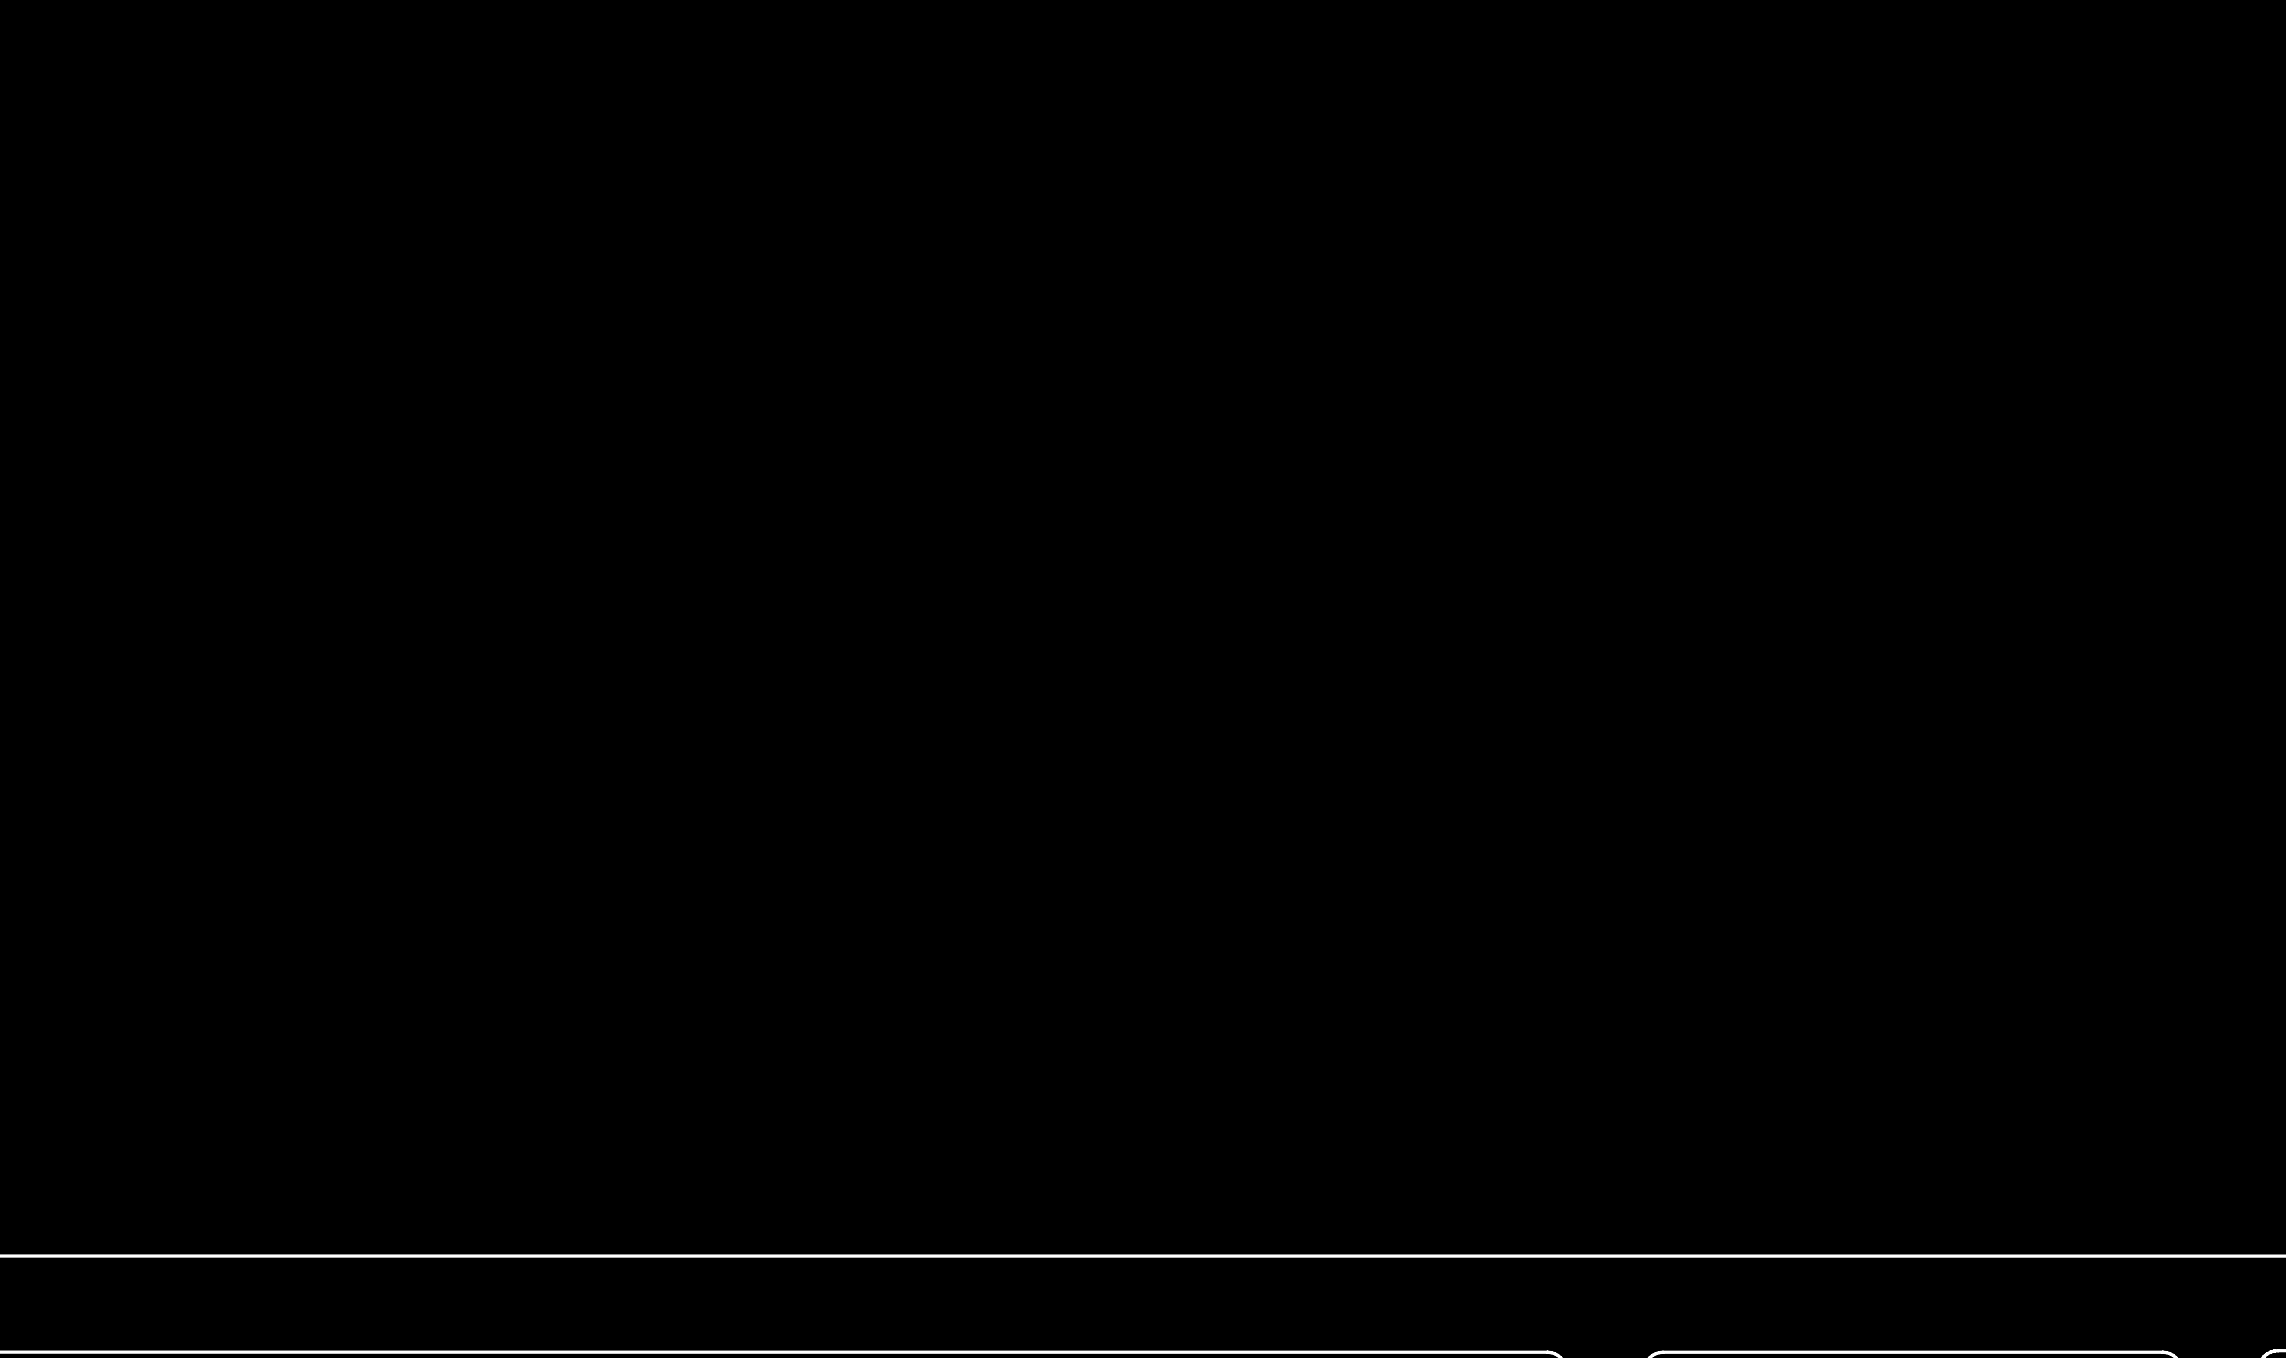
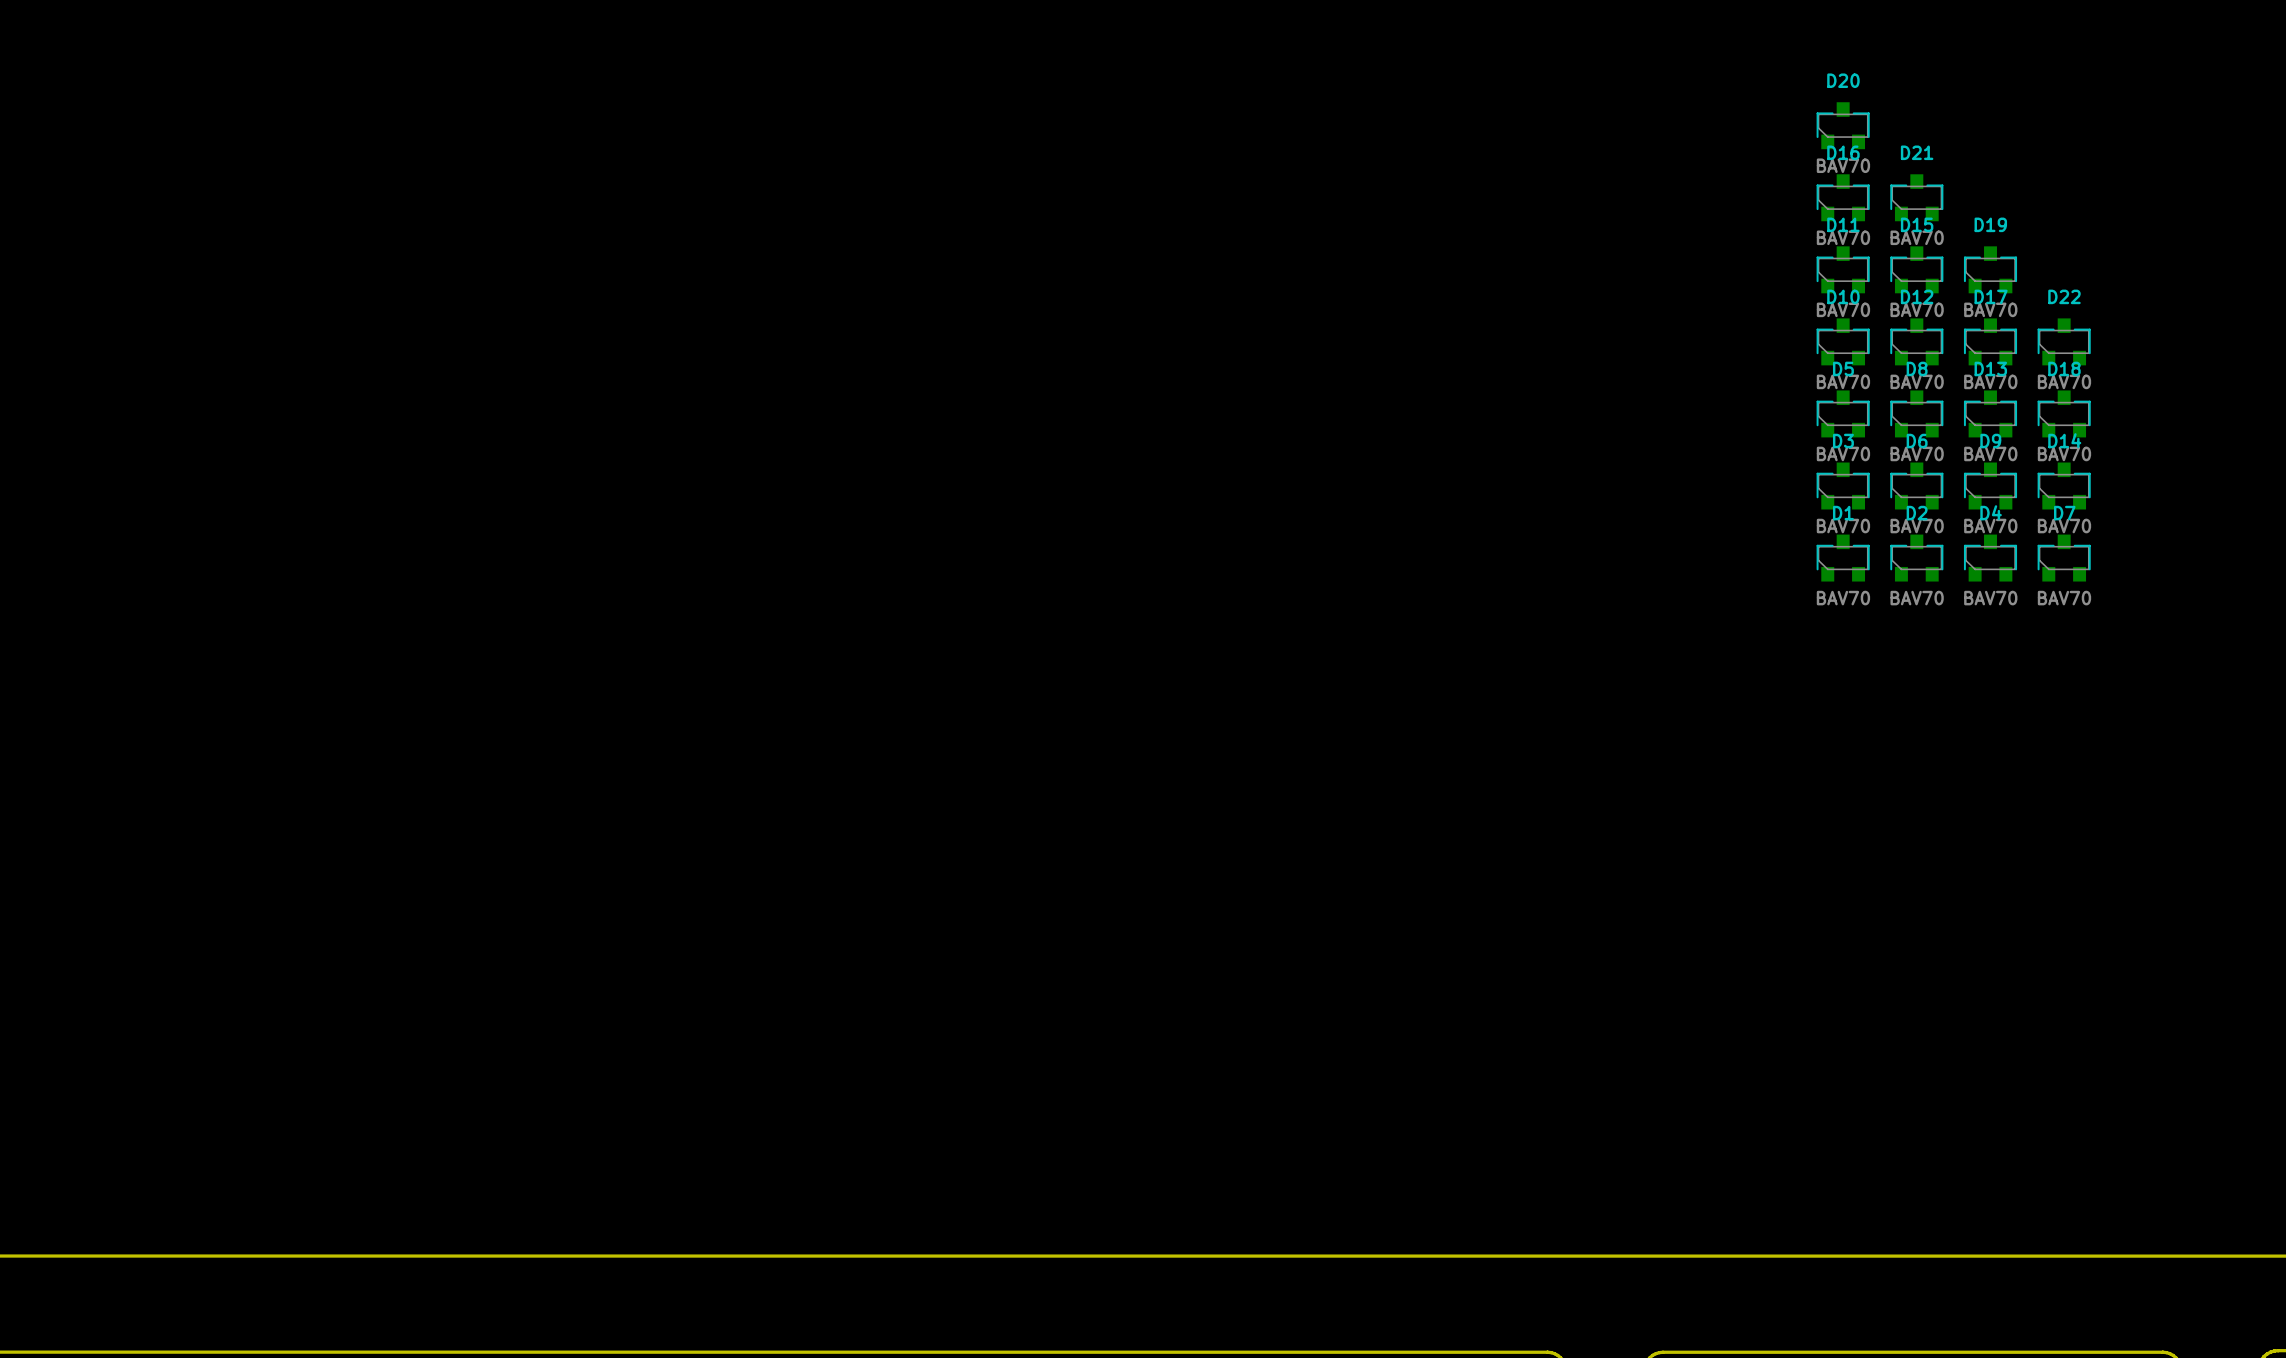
D20: none -> BAV70 (1843, 125)
D16: none -> BAV70 (1843, 197)
D21: none -> BAV70 (1916, 197)
D11: none -> BAV70 (1843, 269)
D15: none -> BAV70 (1916, 269)
D19: none -> BAV70 (1990, 269)
D10: none -> BAV70 (1843, 341)
D12: none -> BAV70 (1916, 341)
D17: none -> BAV70 (1990, 341)
D22: none -> BAV70 (2064, 341)
D5: none -> BAV70 (1843, 413)
D8: none -> BAV70 (1916, 413)
D13: none -> BAV70 (1990, 413)
D18: none -> BAV70 (2064, 413)
D3: none -> BAV70 (1843, 485)
D6: none -> BAV70 (1916, 485)
D9: none -> BAV70 (1990, 485)
D14: none -> BAV70 (2064, 485)
D1: none -> BAV70 (1843, 558)
D2: none -> BAV70 (1916, 558)
D4: none -> BAV70 (1990, 558)
D7: none -> BAV70 (2064, 558)

